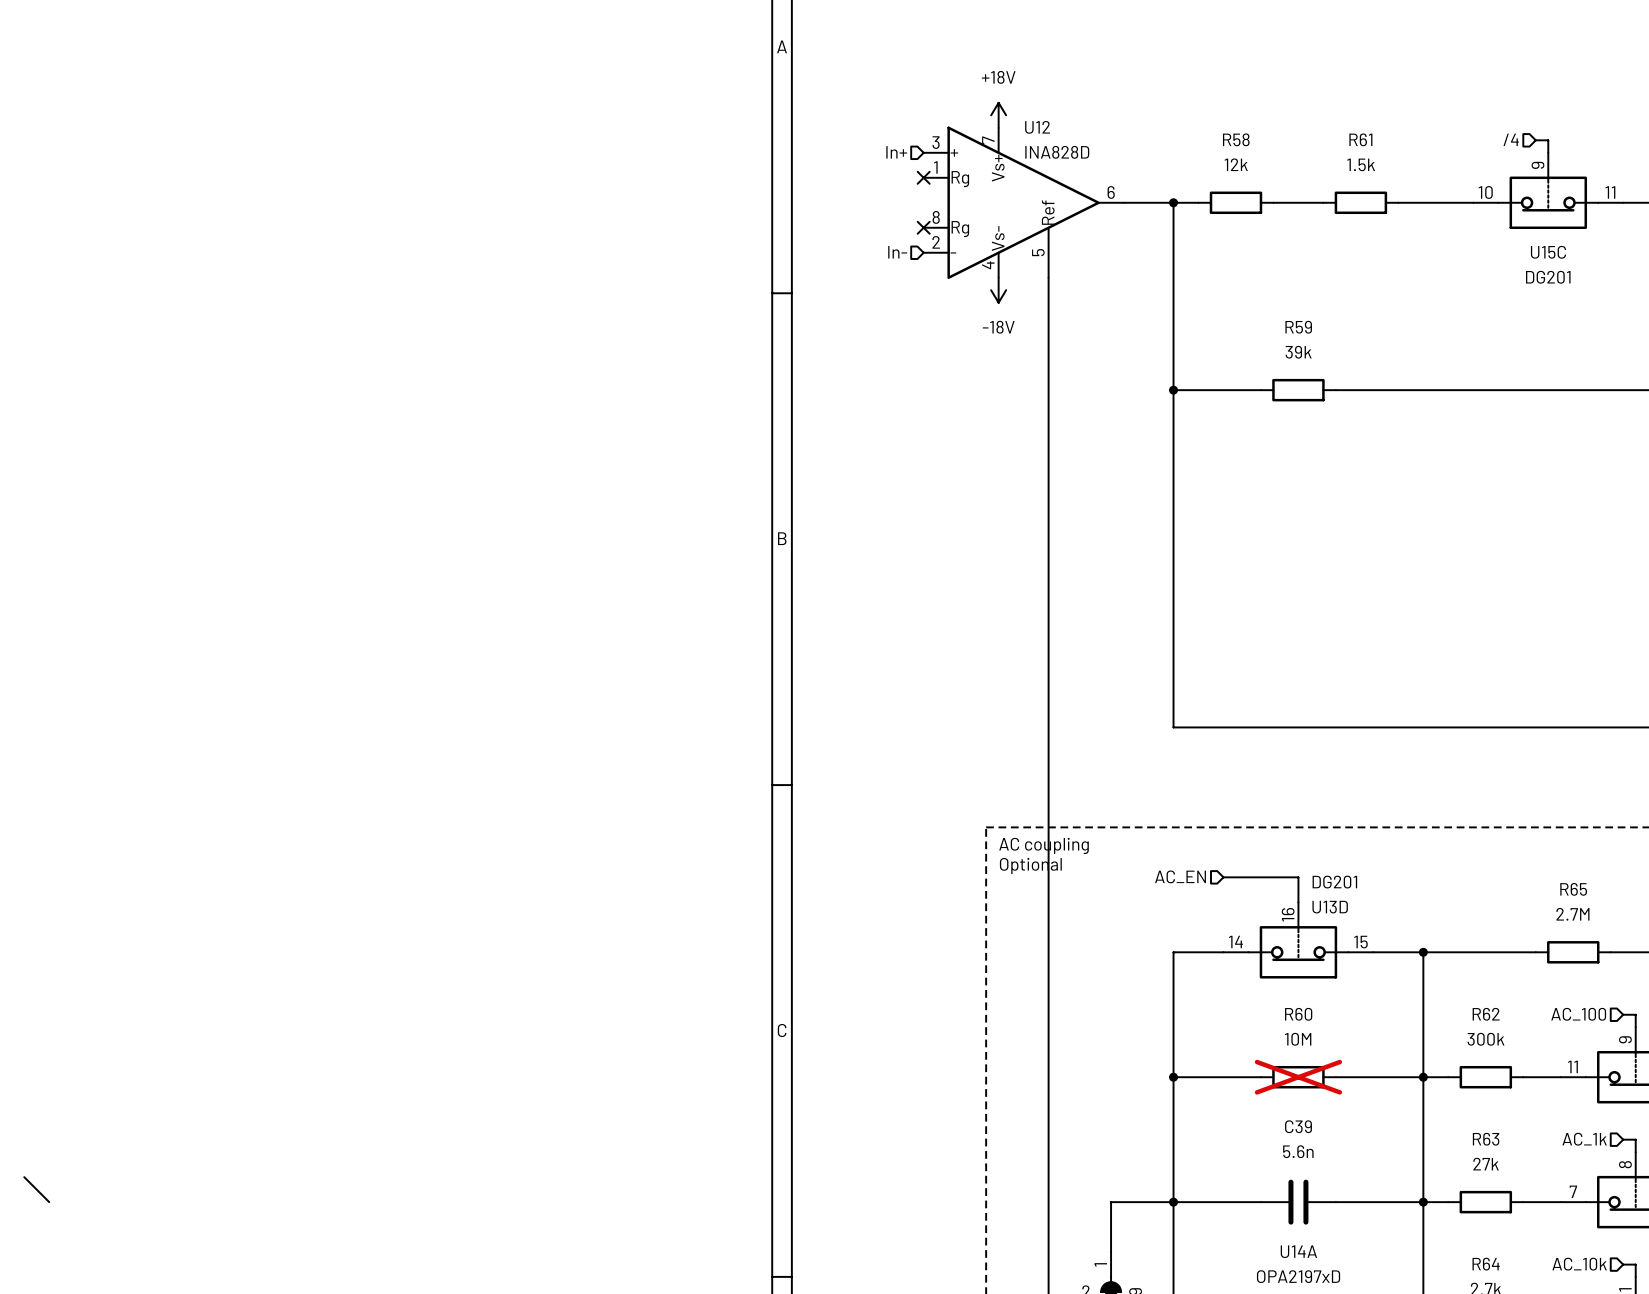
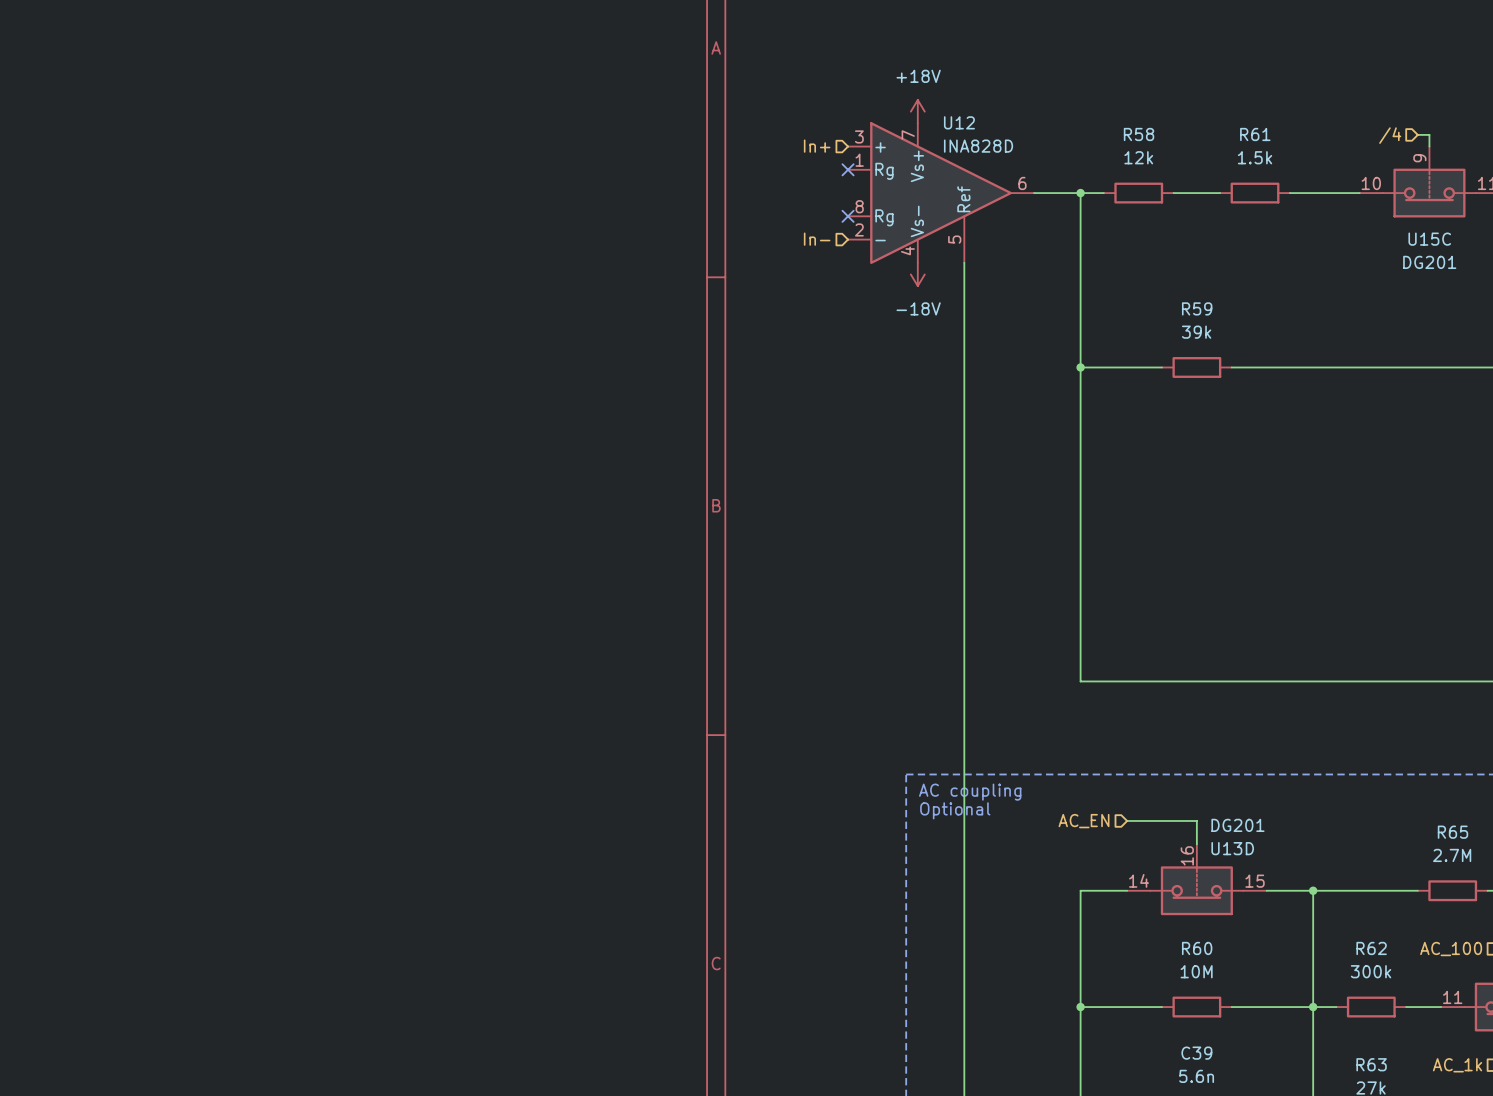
R60 do-not-place cross: (1298, 1077) -> none

